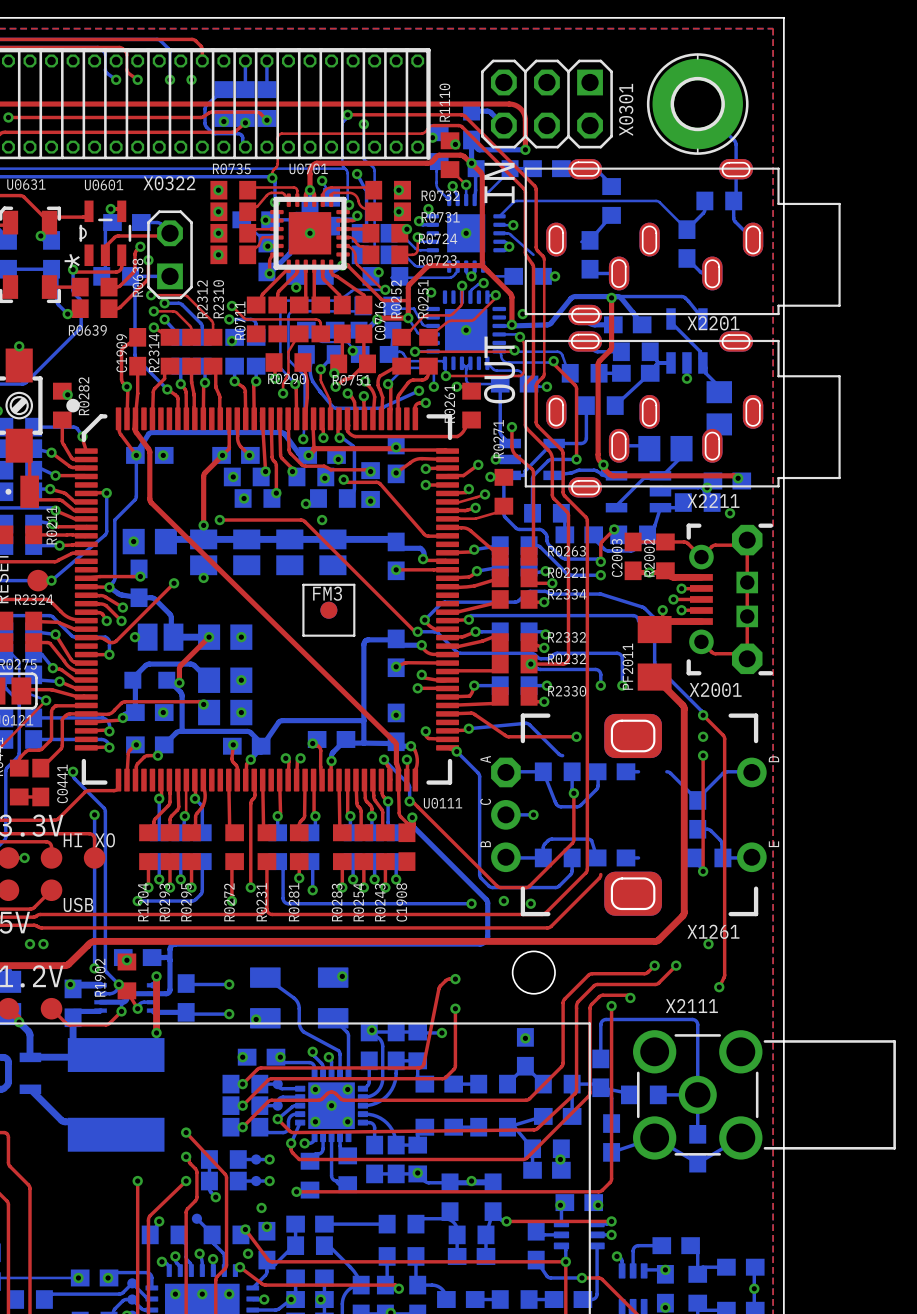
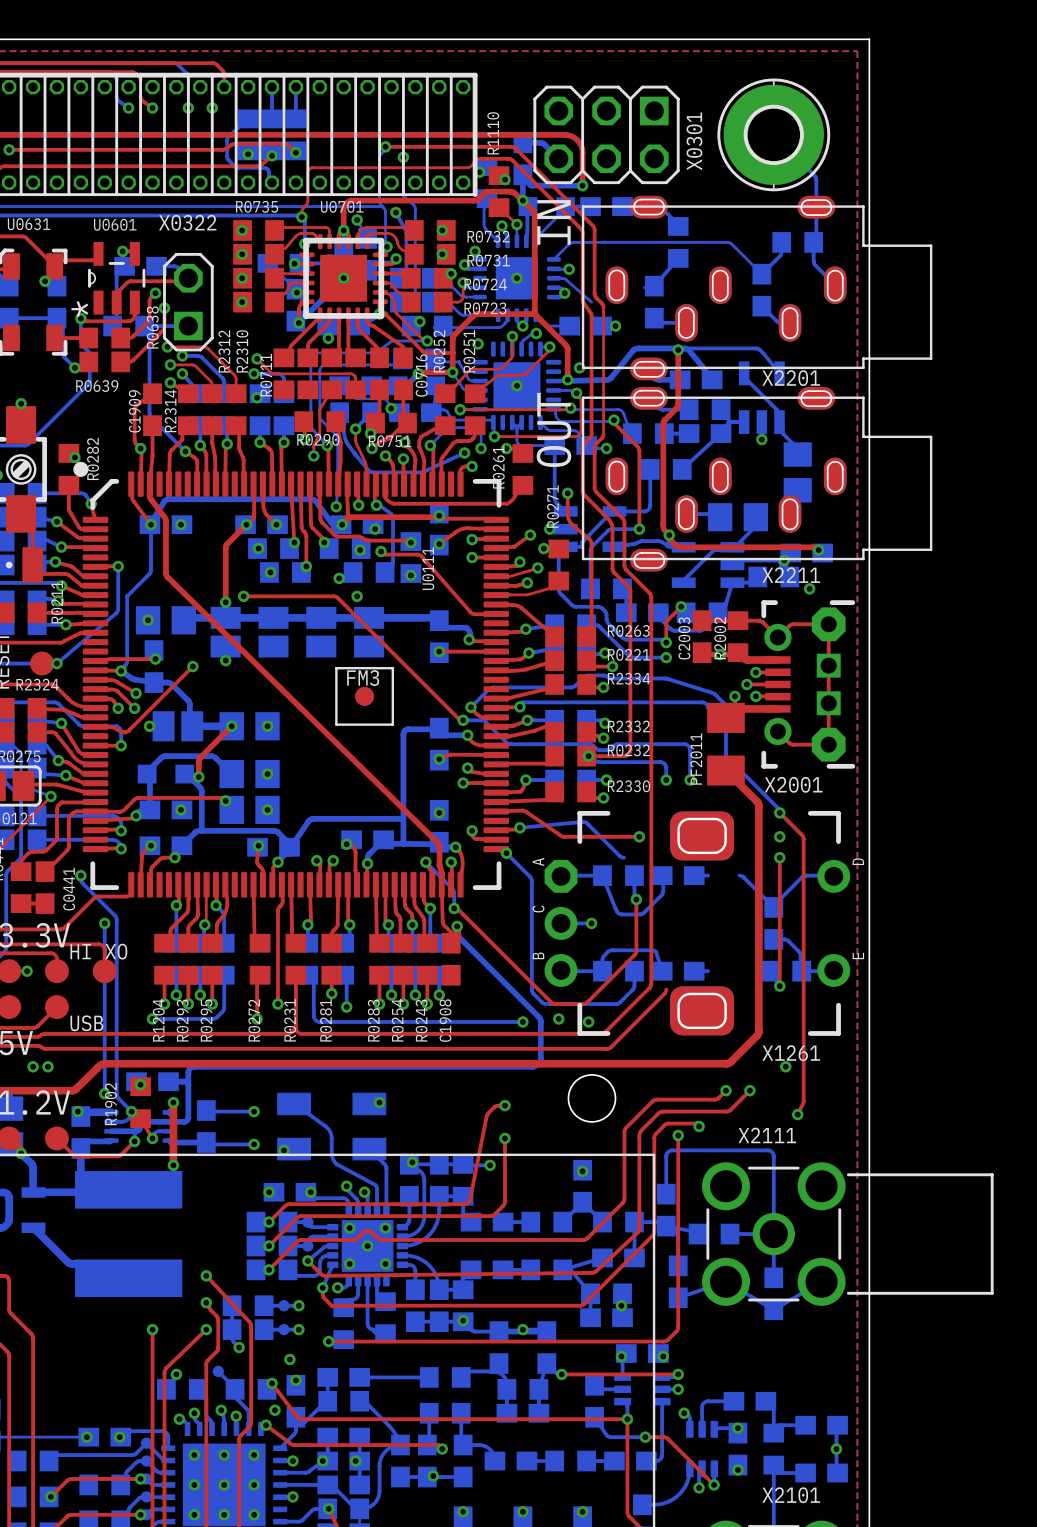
X2001 footprint: [686, 523, 774, 676] -> [761, 600, 856, 769]
U0111 name rotation: 0° (443, 803) -> 90° counterclockwise (428, 568)
U0111 name position: U0111 (443, 803) -> U0111 (428, 568)

